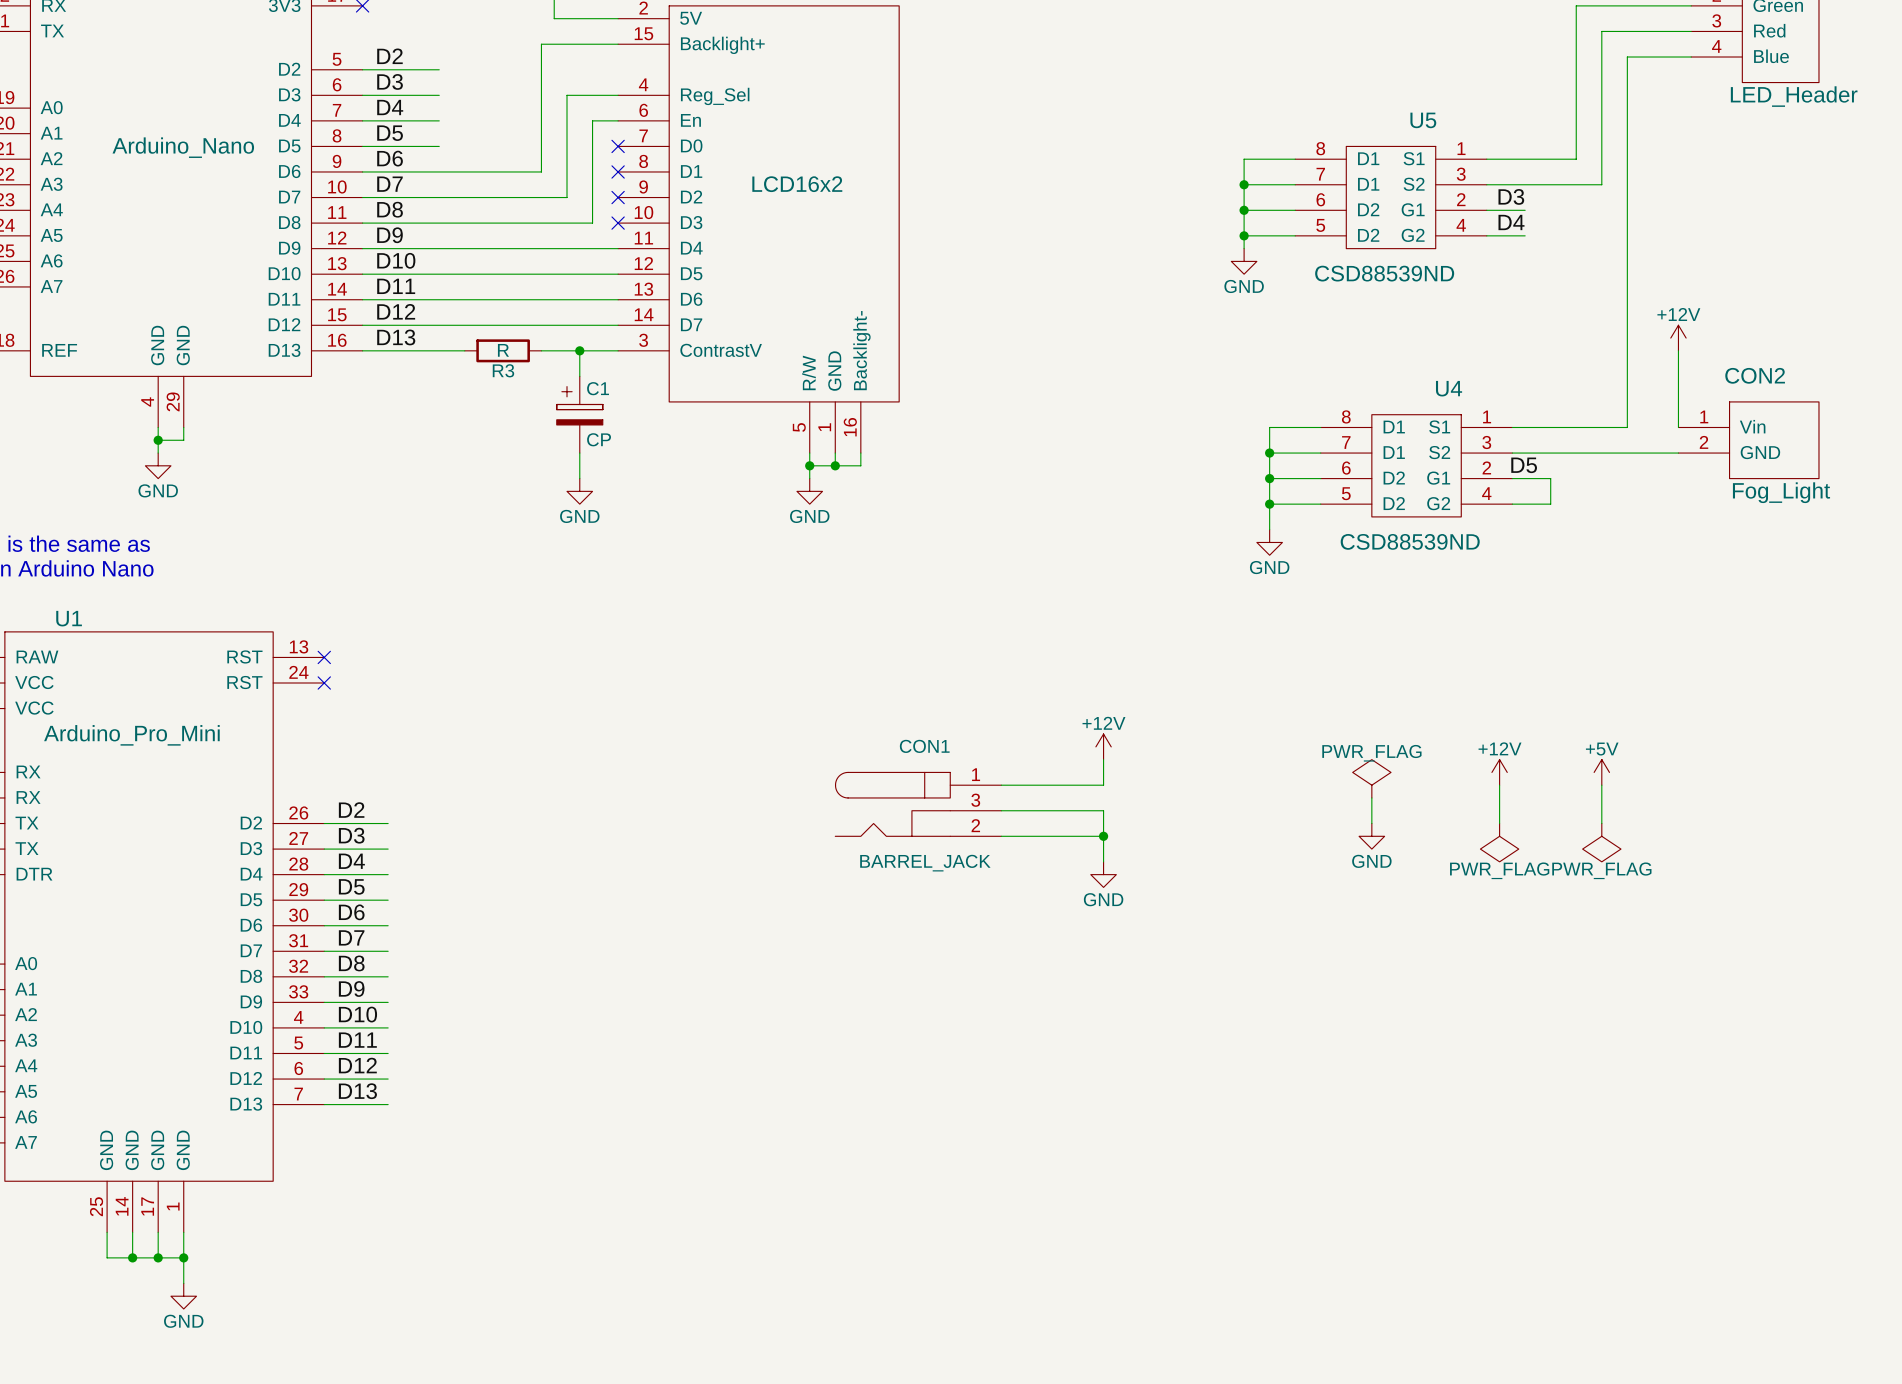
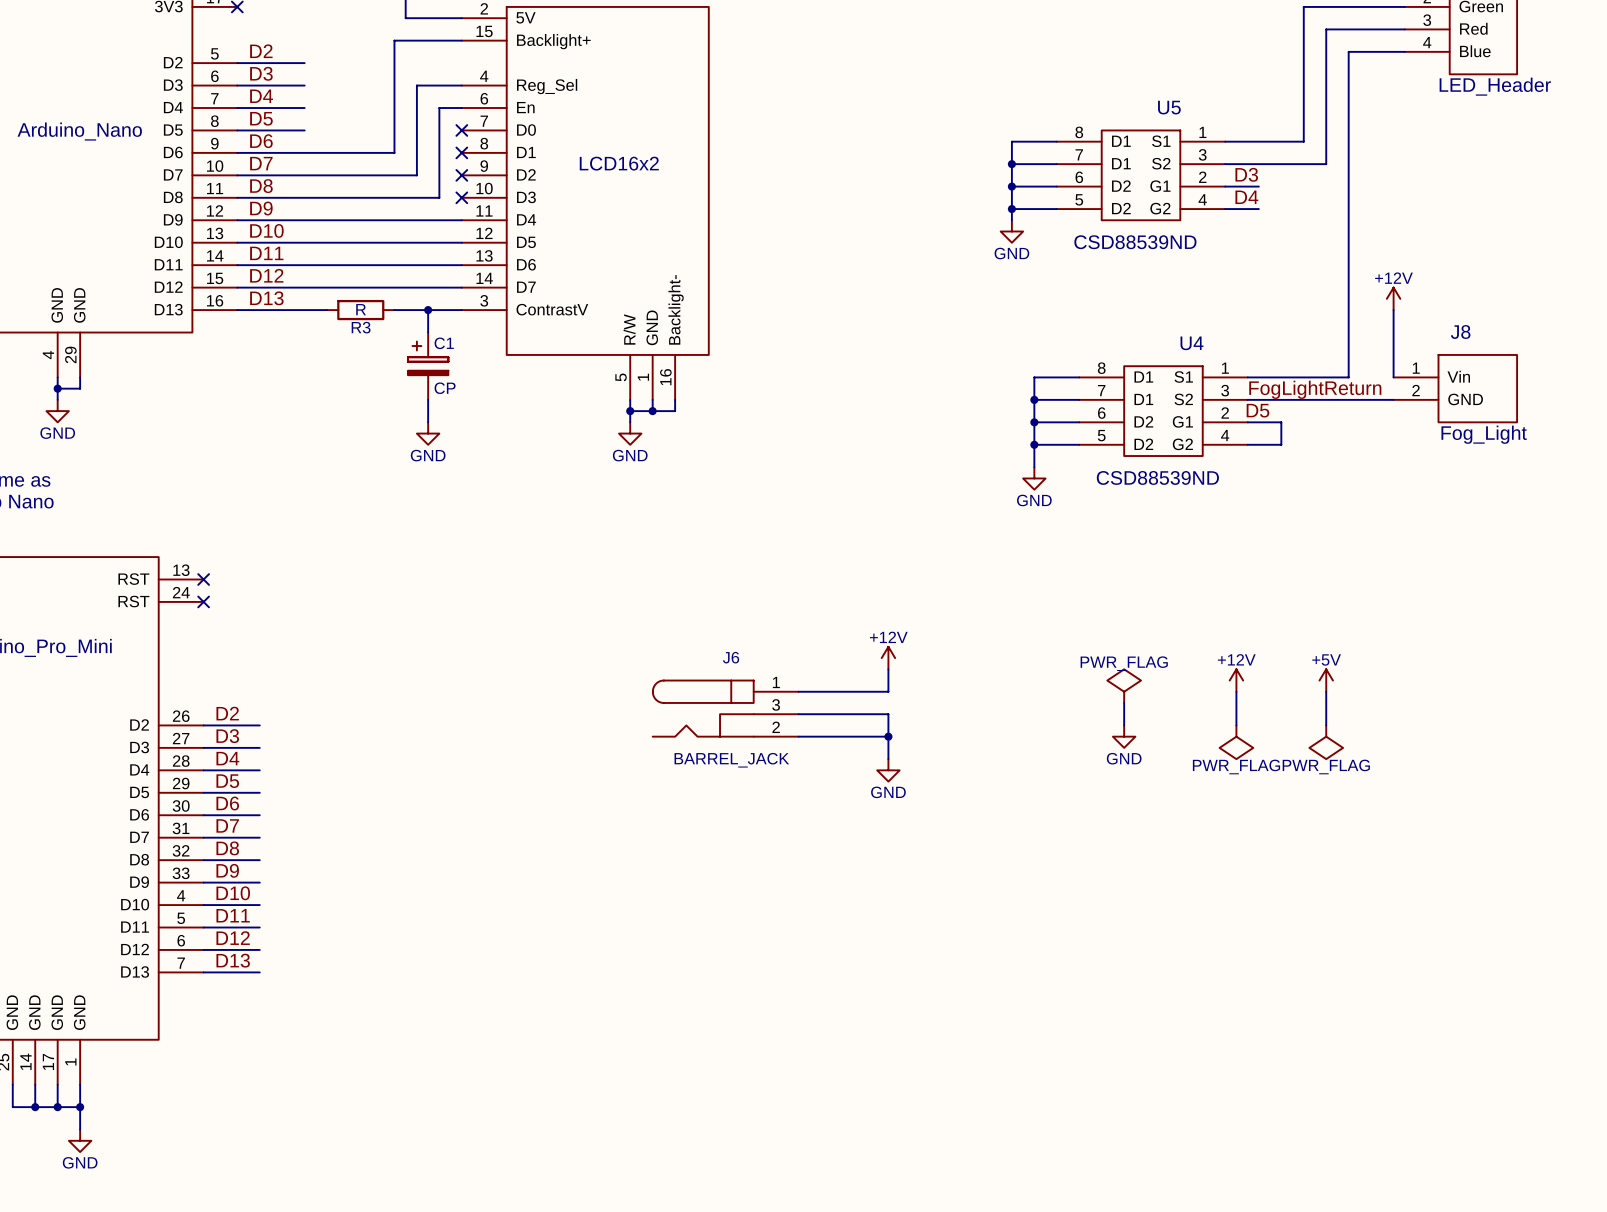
CON2 name: CON2 (1755, 375) -> J8 (1460, 332)
label: none -> FogLightReturn (1315, 389)
CON1 name: CON1 (924, 746) -> J6 (731, 657)

